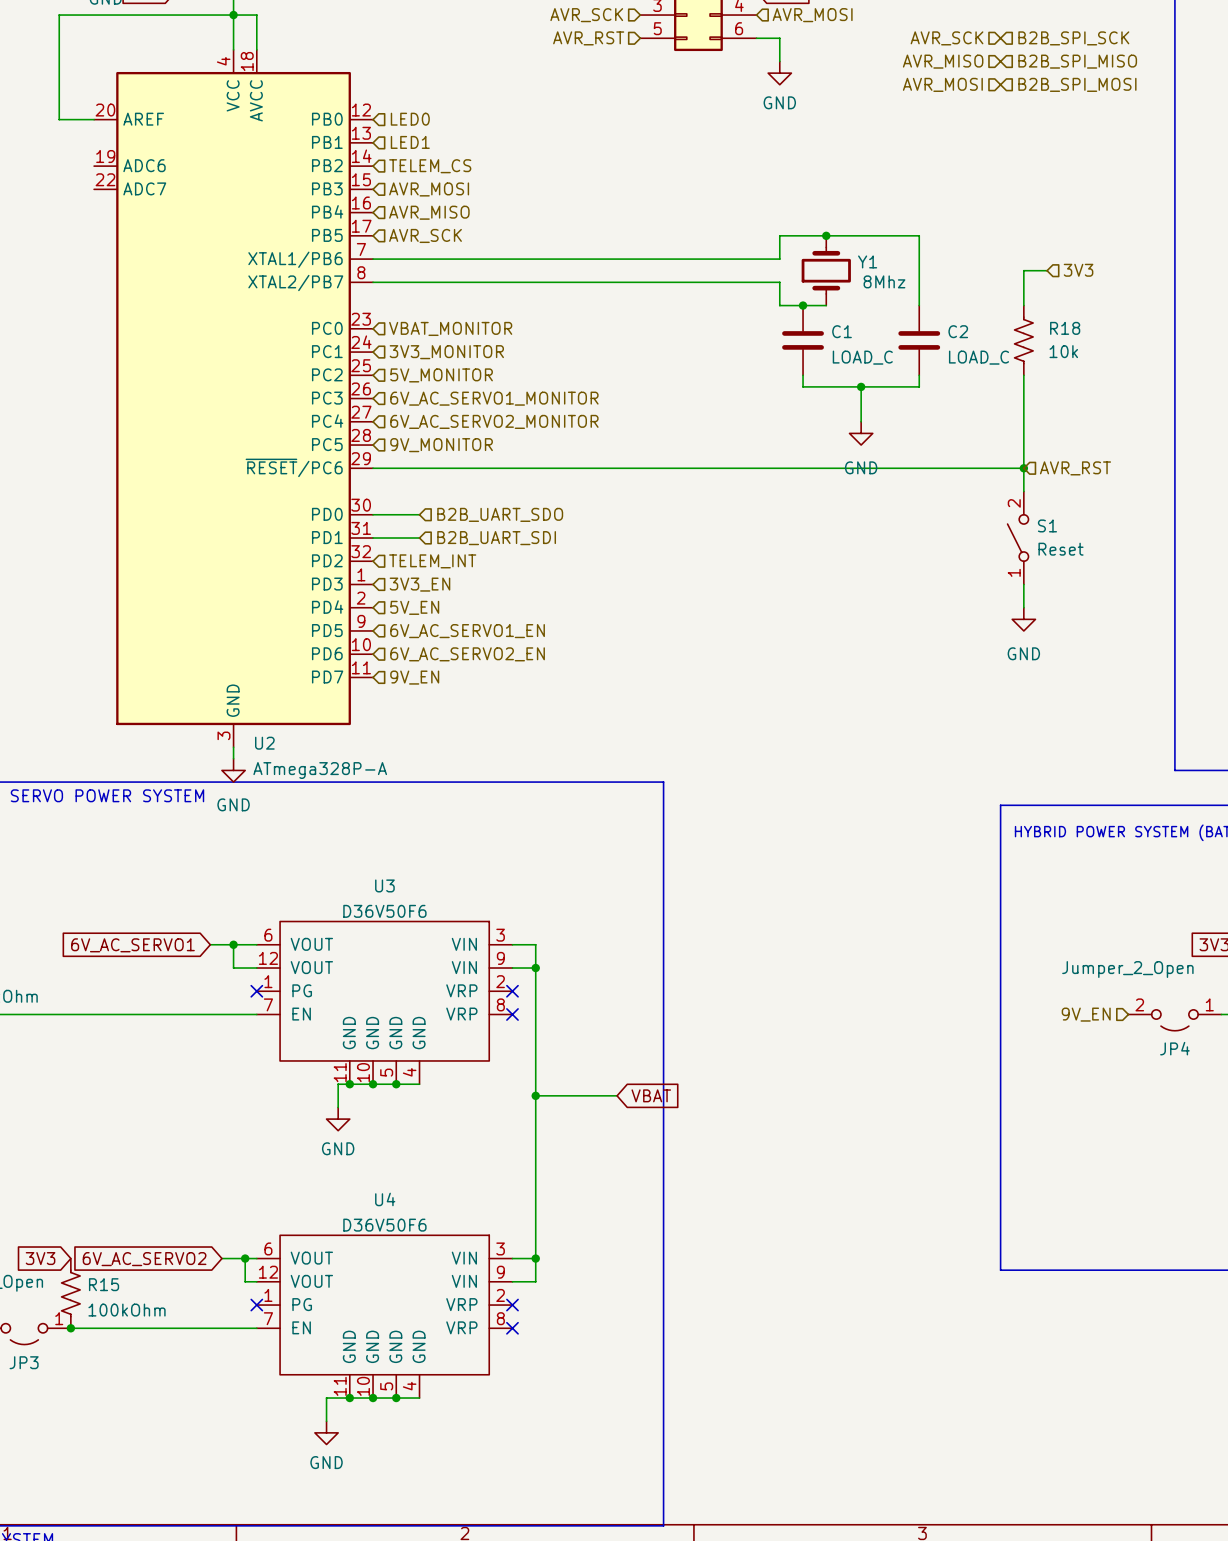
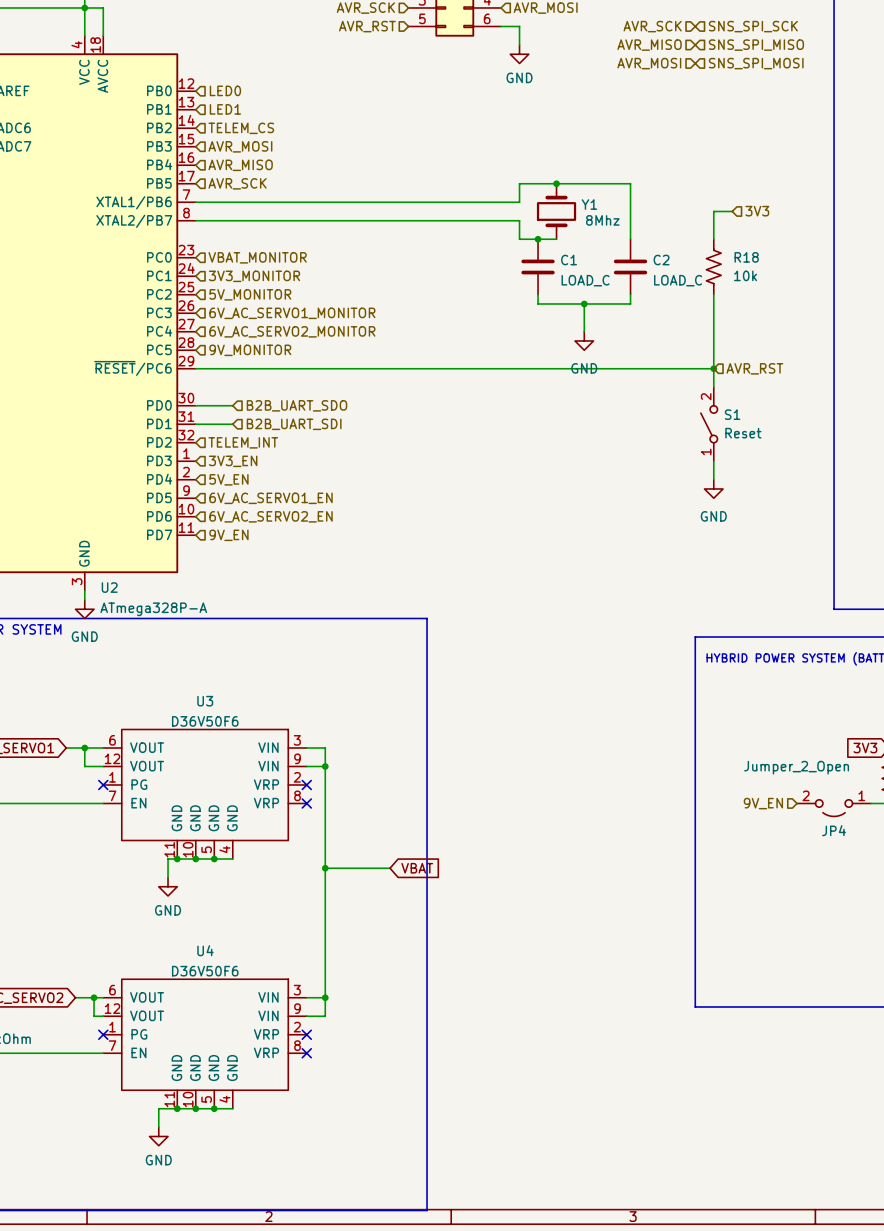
hierarchical label: B2B_SPI_SCK (1073, 38) -> SNS_SPI_SCK (753, 26)
hierarchical label: B2B_SPI_MISO (1077, 61) -> SNS_SPI_MISO (756, 45)
hierarchical label: B2B_SPI_MOSI (1077, 84) -> SNS_SPI_MOSI (756, 63)

